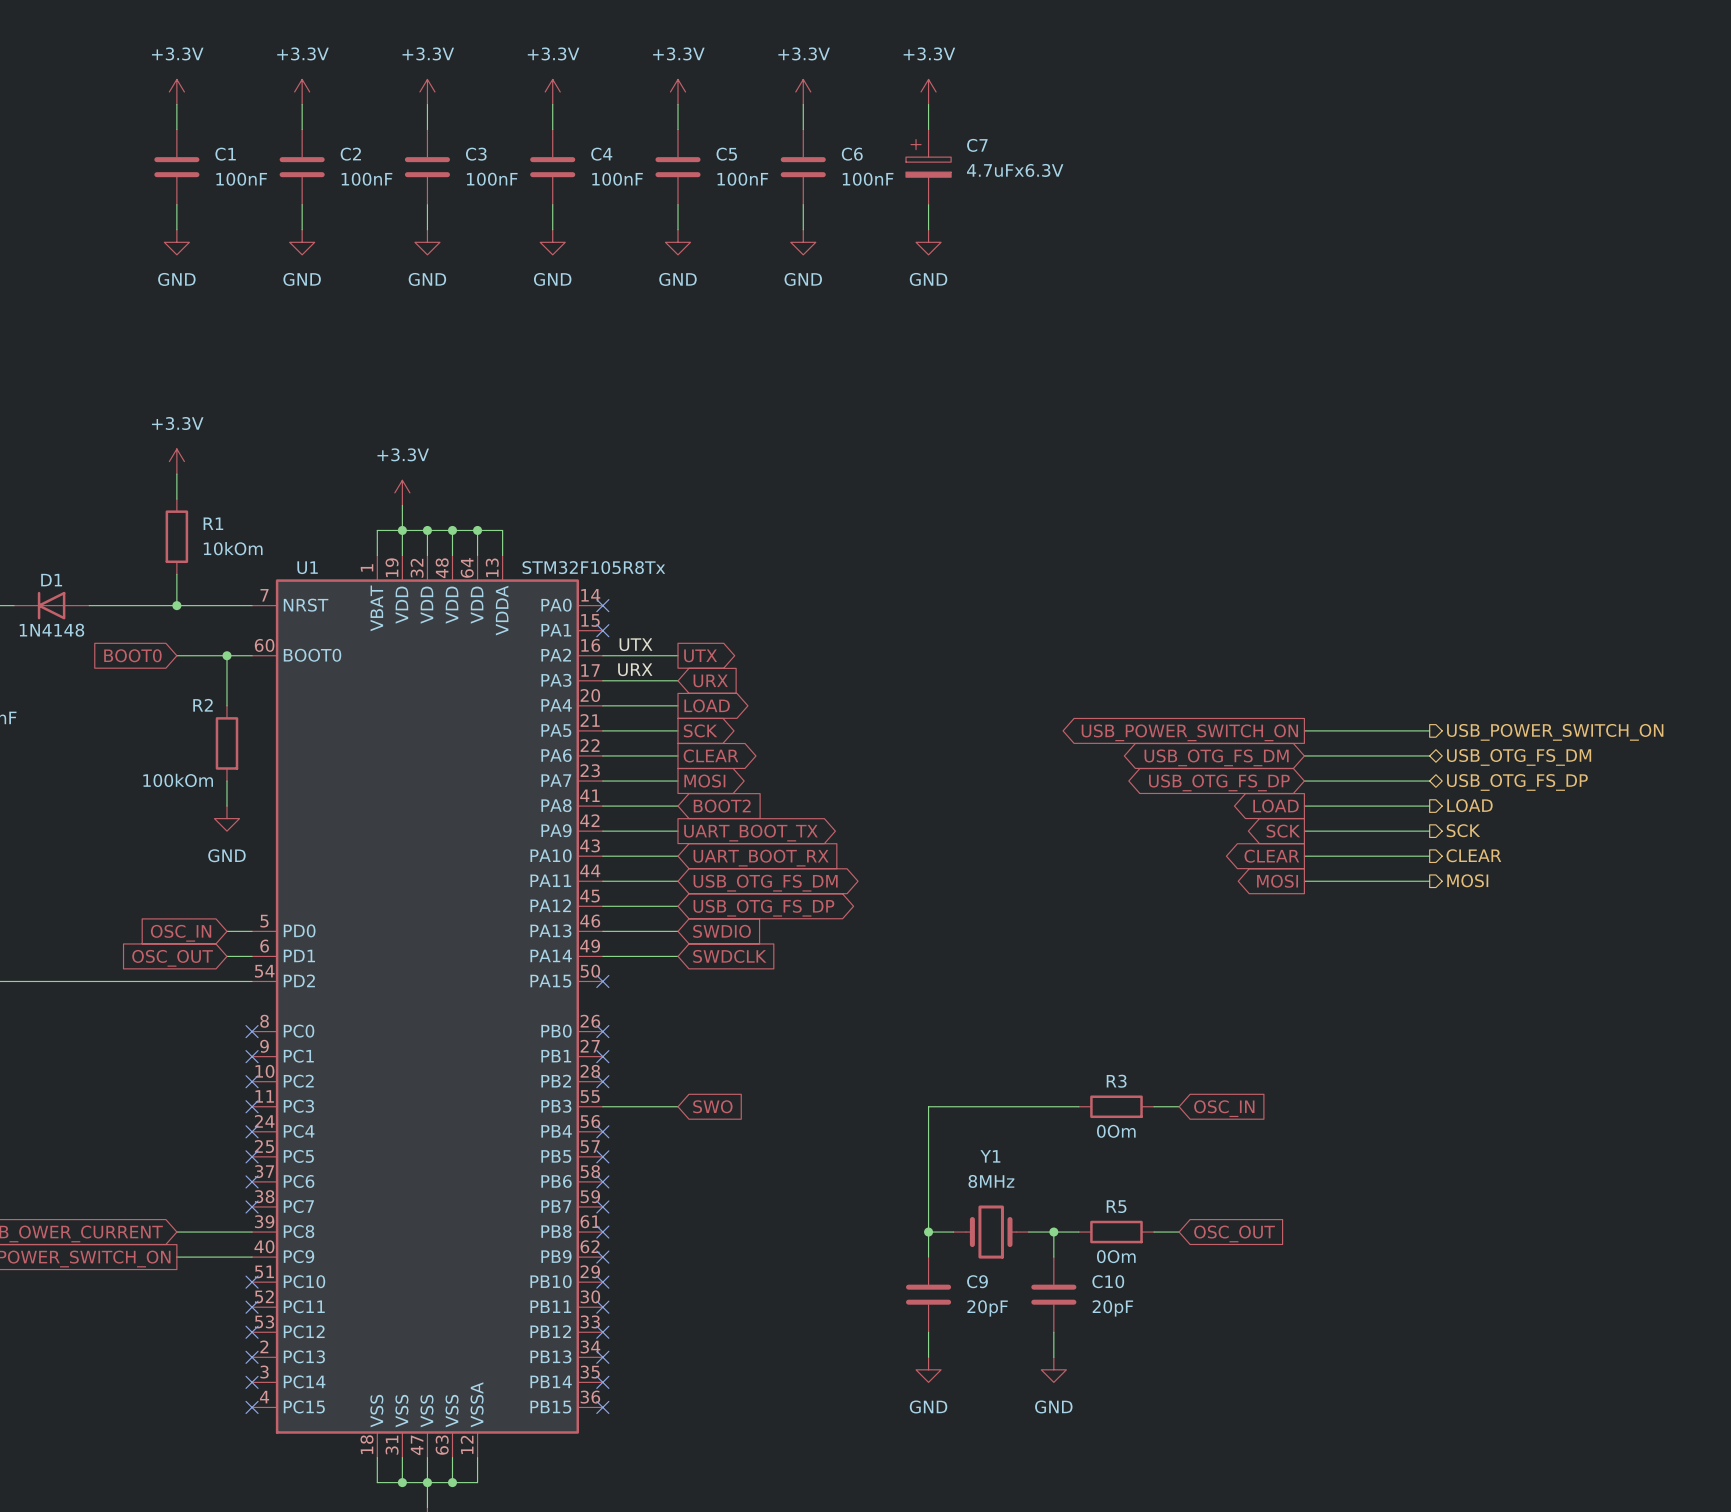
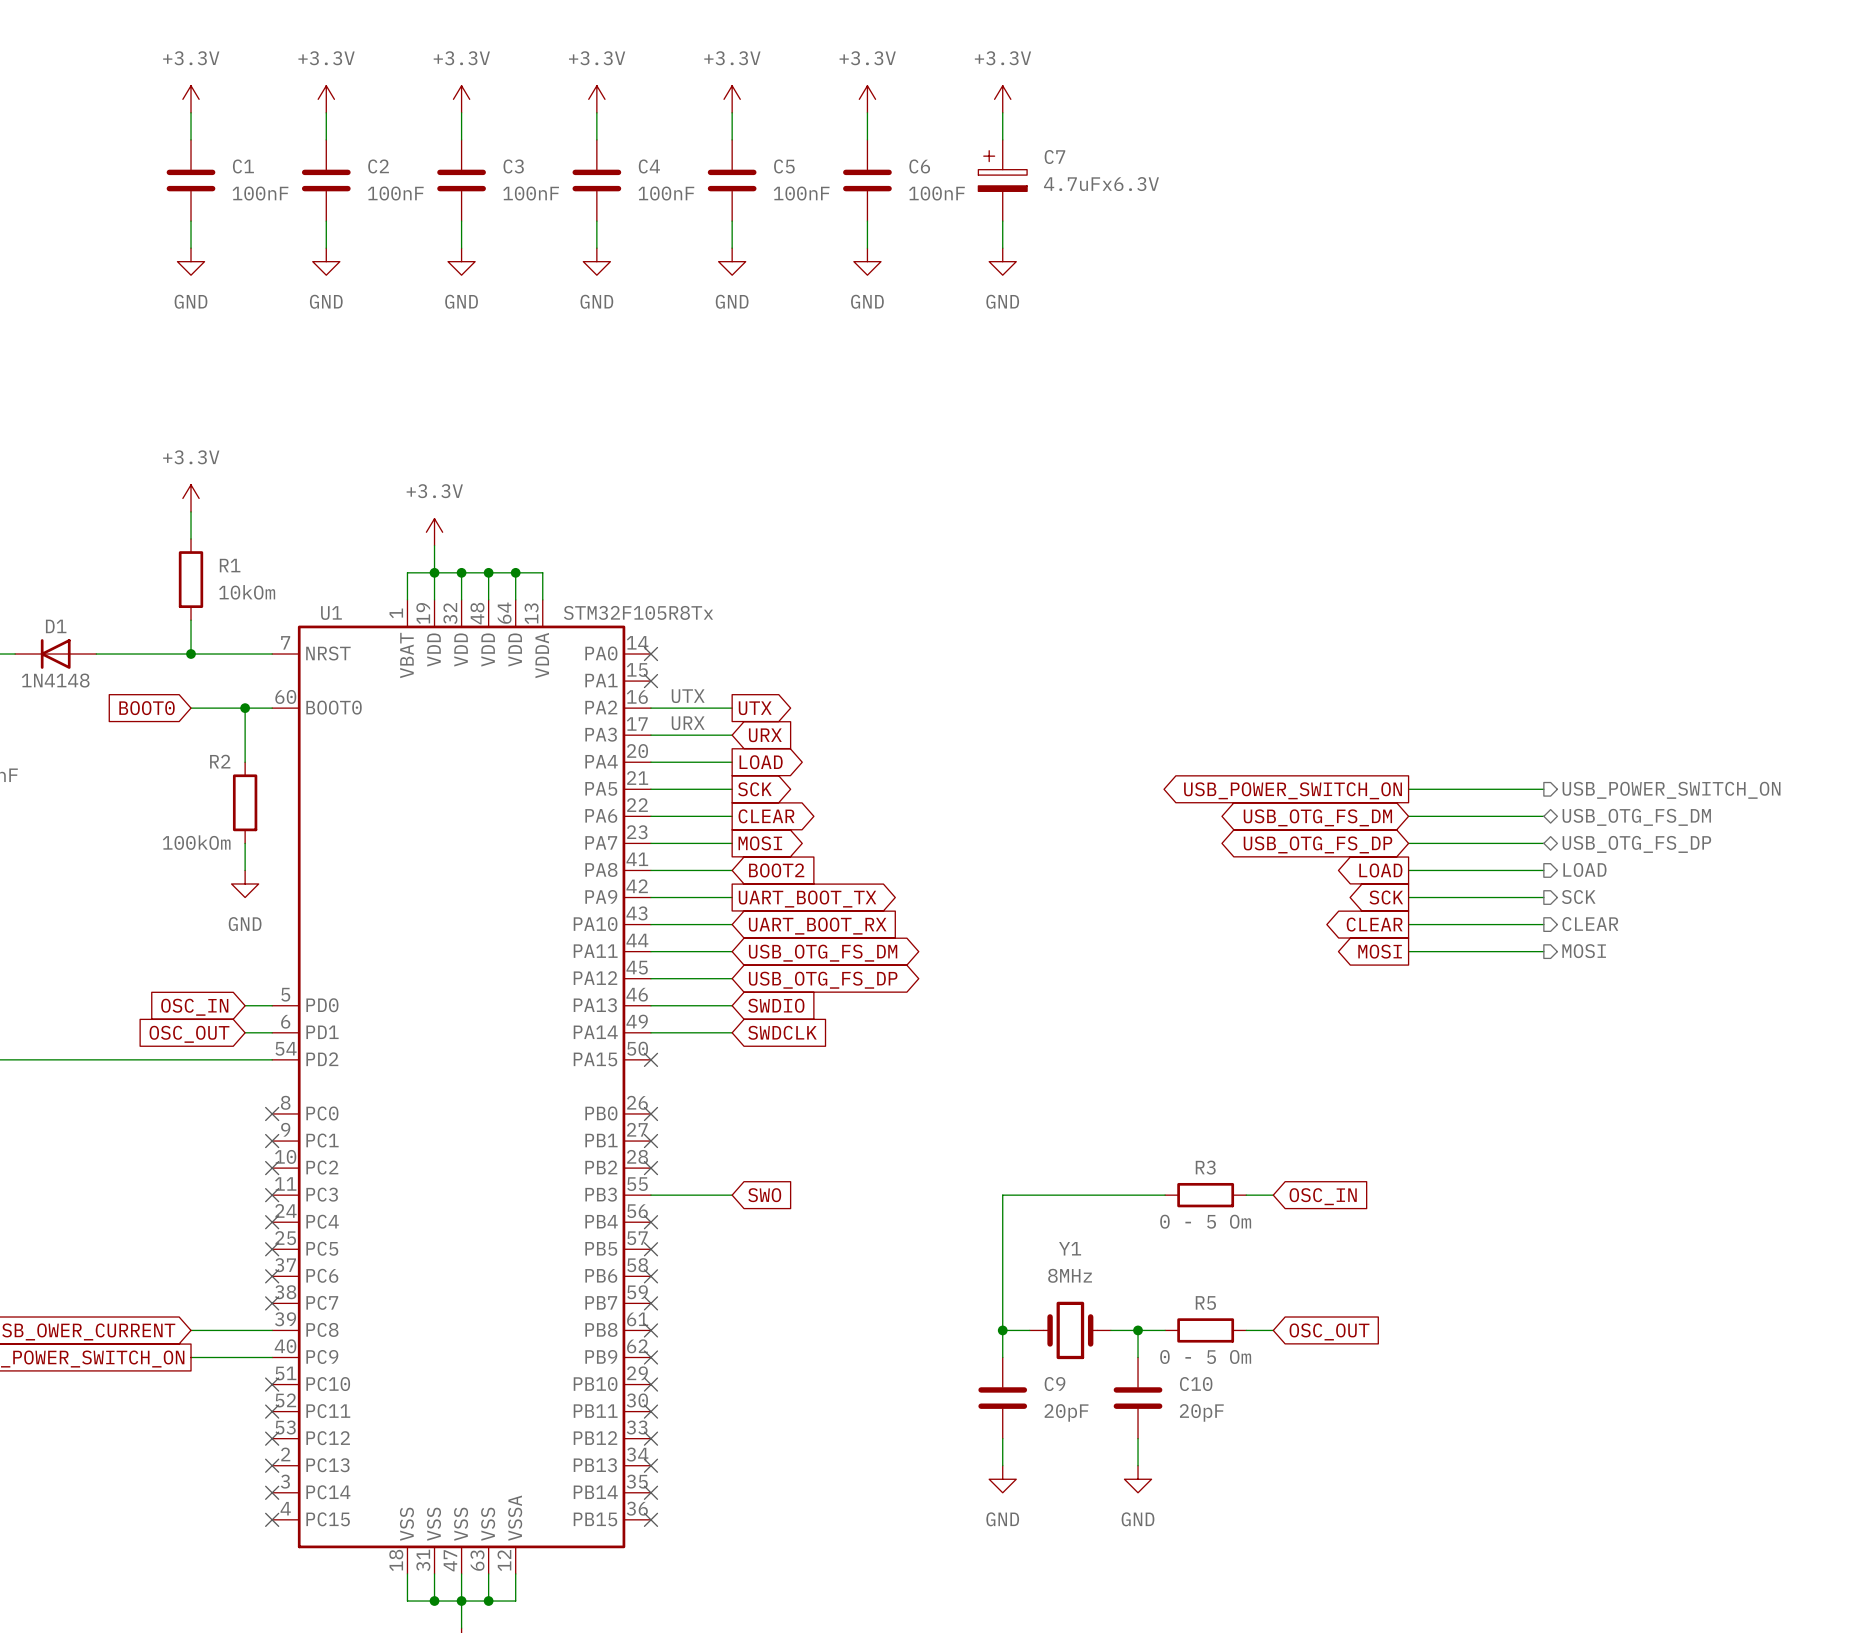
R3 value: 0Om (1116, 1131) -> 0 - 5 Om (1205, 1221)
R5 value: 0Om (1116, 1256) -> 0 - 5 Om (1205, 1356)

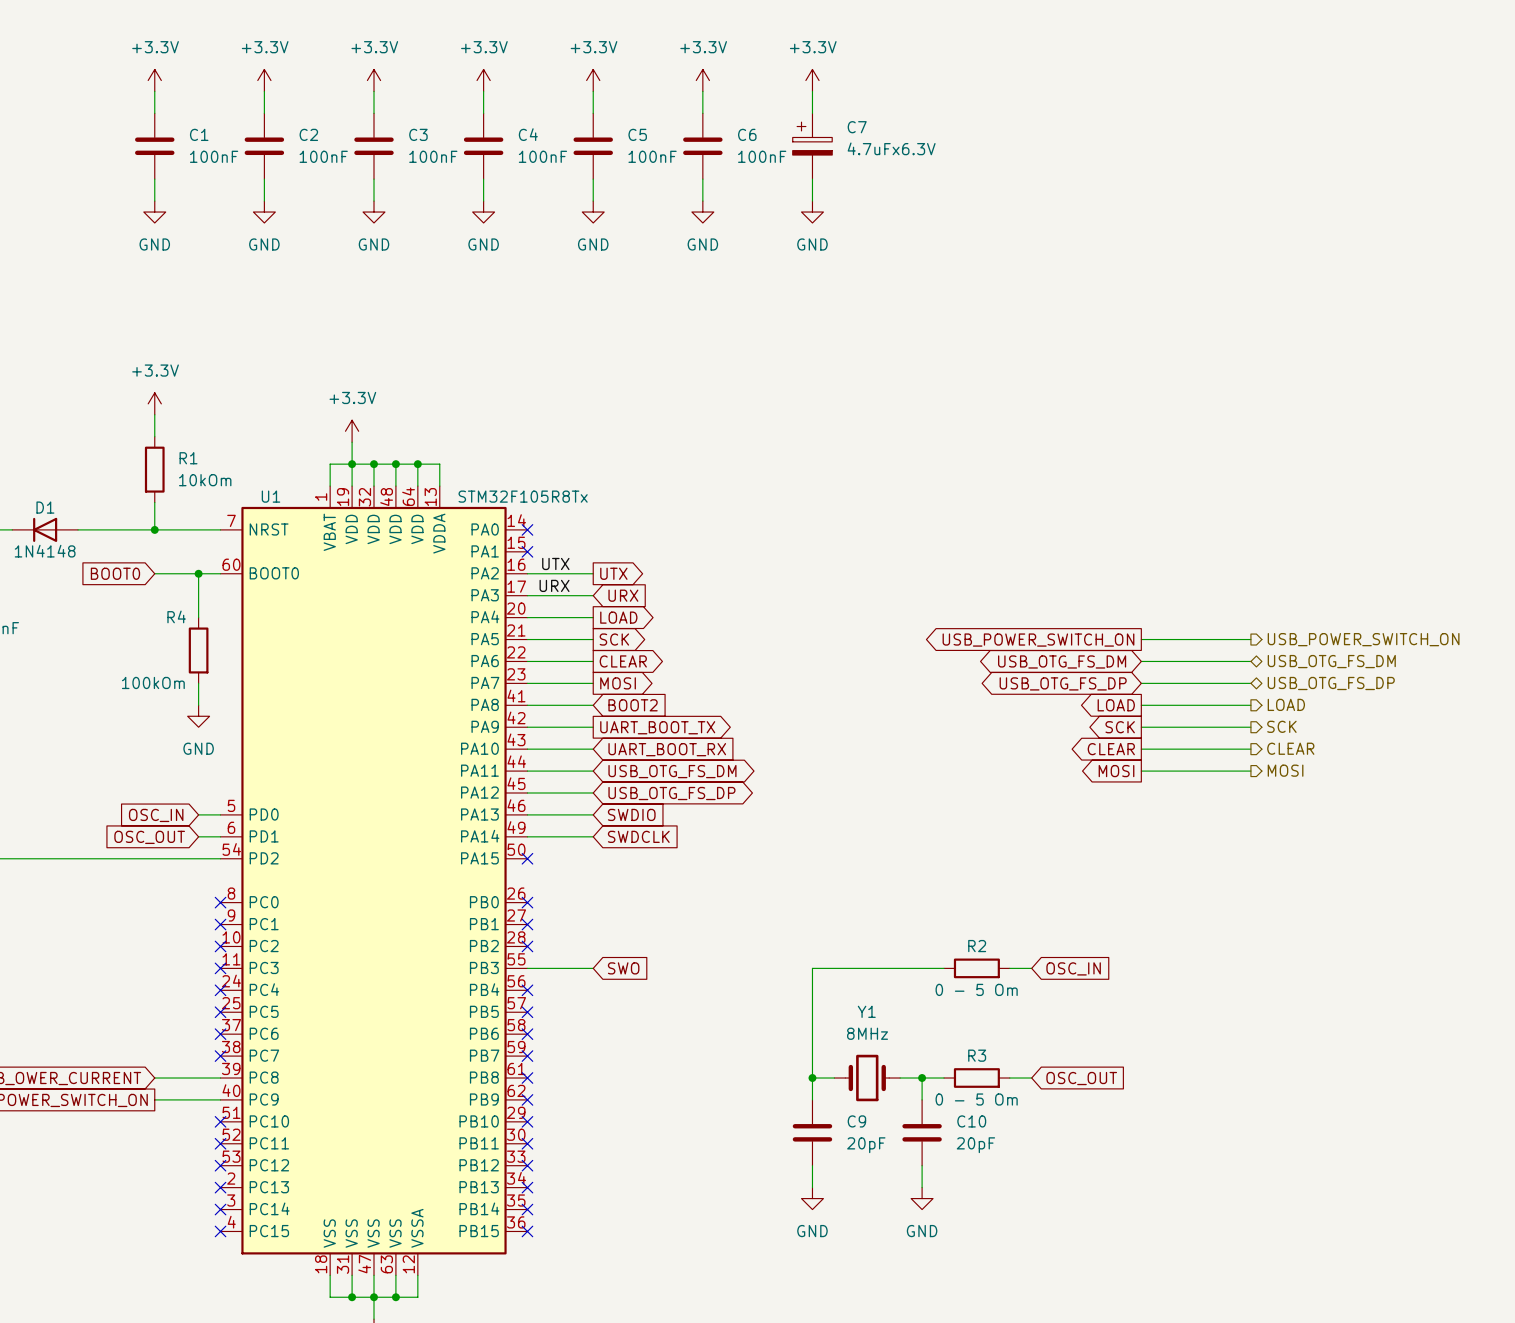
R2 name: R2 (220, 761) -> R4 (176, 616)
R3 name: R3 (1205, 1167) -> R2 (977, 946)
R5 name: R5 (1205, 1302) -> R3 (977, 1055)

